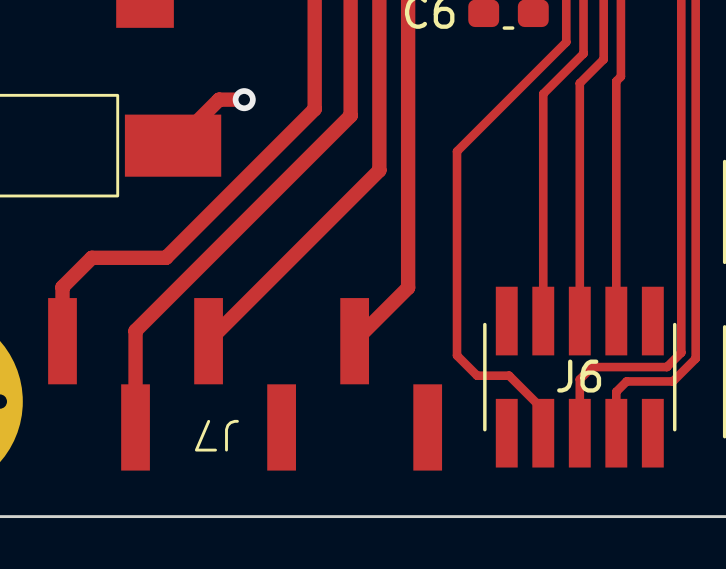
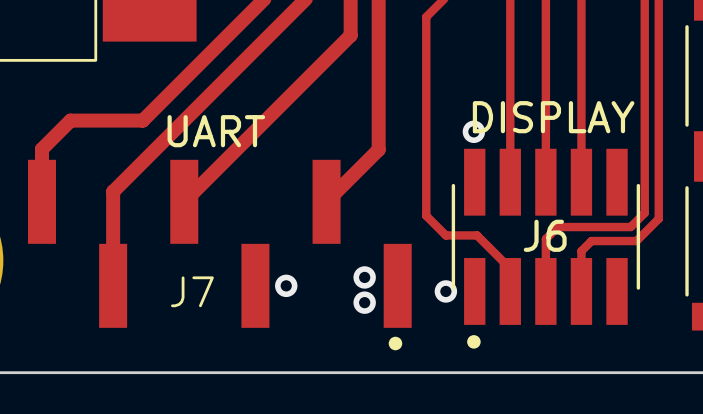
text: none -> DISPLAY (553, 117)
text: none -> UART (216, 131)
via: none -> (473, 131)
via: none -> (364, 277)
via: none -> (286, 285)
via: none -> (445, 291)
J7 name rotation: 0° (216, 435) -> 180° (192, 291)
via: none -> (364, 302)
drawing: none -> [467, 335, 481, 349]
drawing: none -> [388, 336, 403, 351]

